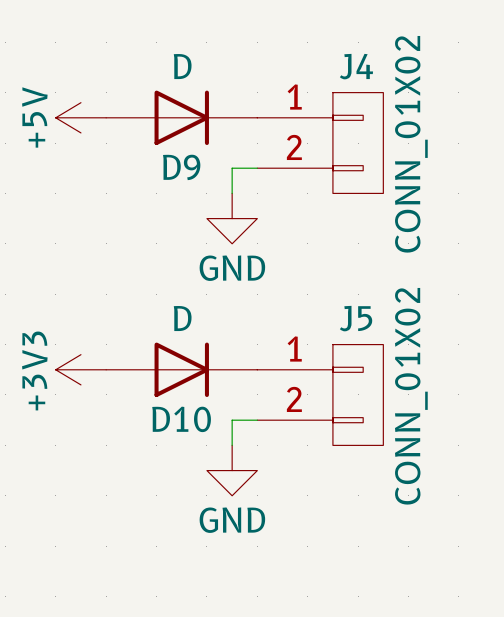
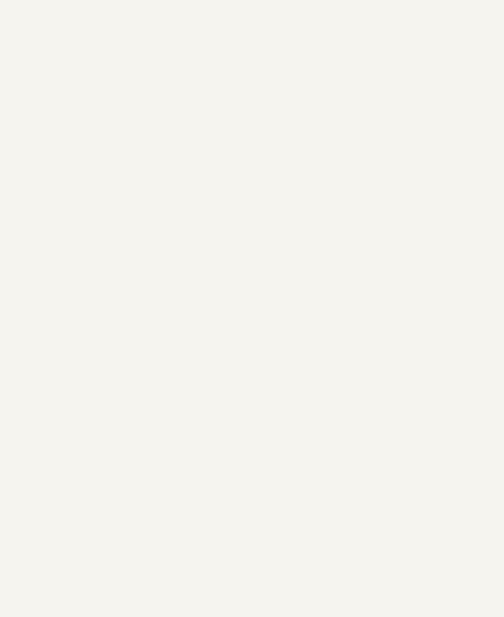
power symbol: +5V (80, 117) -> none
D9: D (181, 117) -> none
J4: CONN_01X02 (320, 143) -> none
wire: (257, 168) (232, 168) (232, 193) -> none
power symbol: GND (232, 218) -> none
power symbol: +3V3 (80, 369) -> none
D10: D (181, 369) -> none
J5: CONN_01X02 (320, 394) -> none
wire: (257, 420) (232, 420) (232, 445) -> none
power symbol: GND (232, 470) -> none

